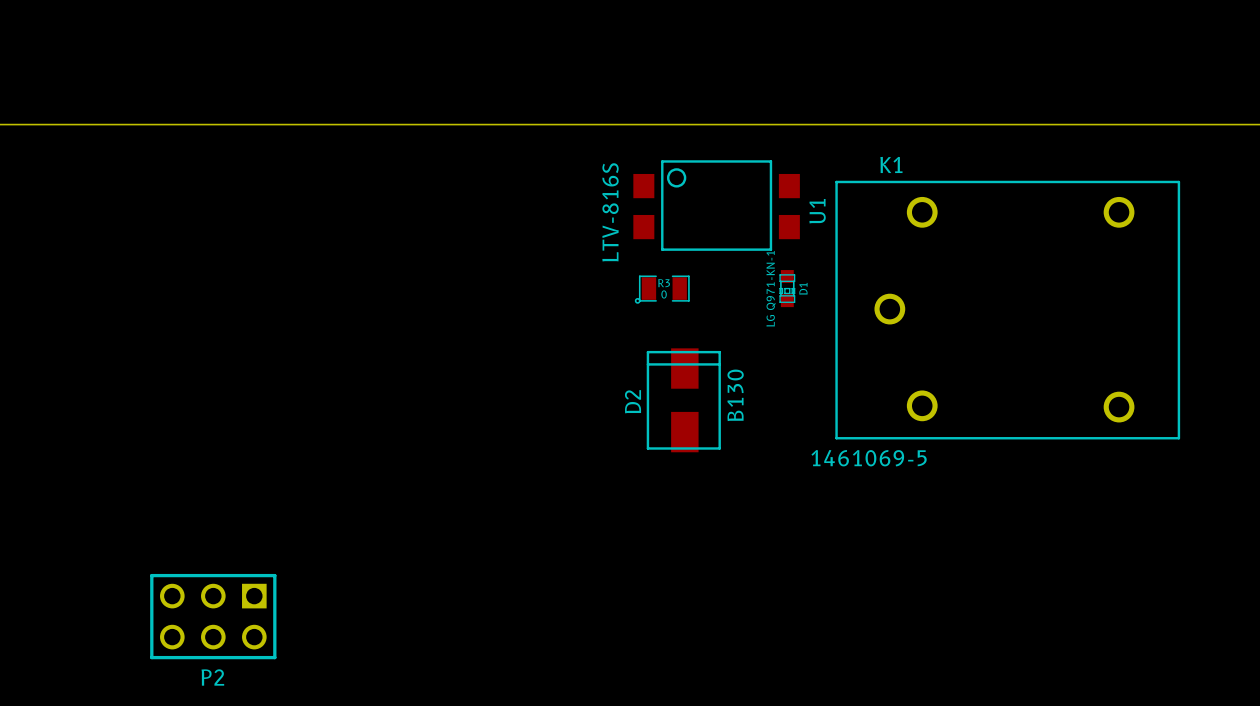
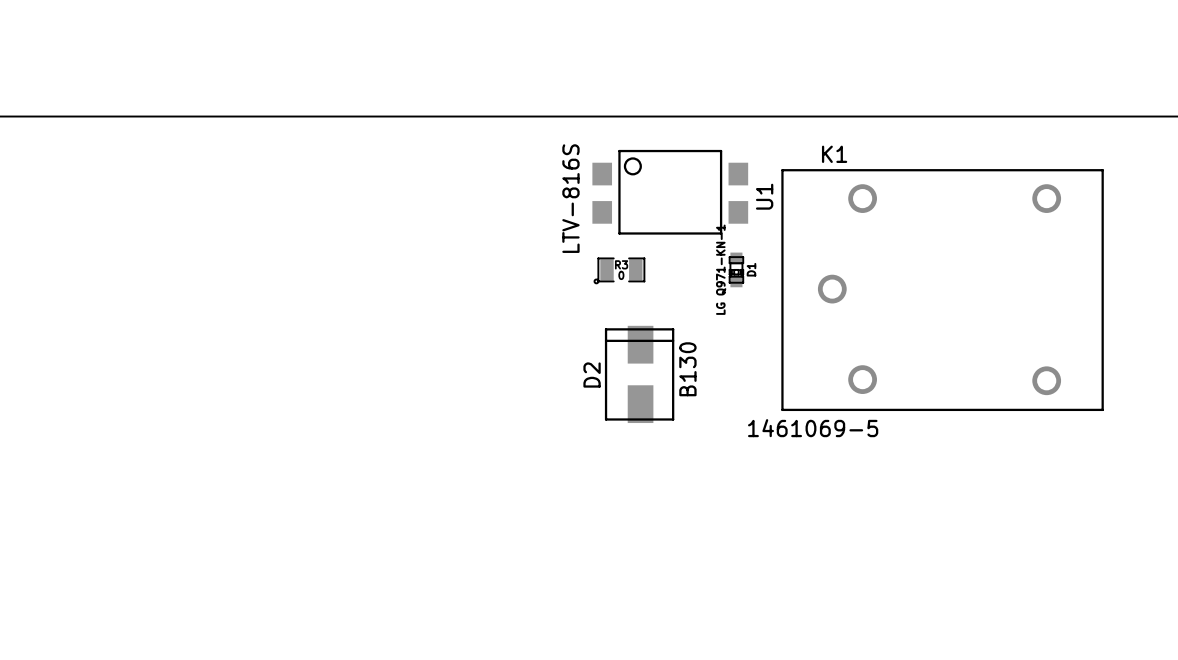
P2: (213, 616) -> none

